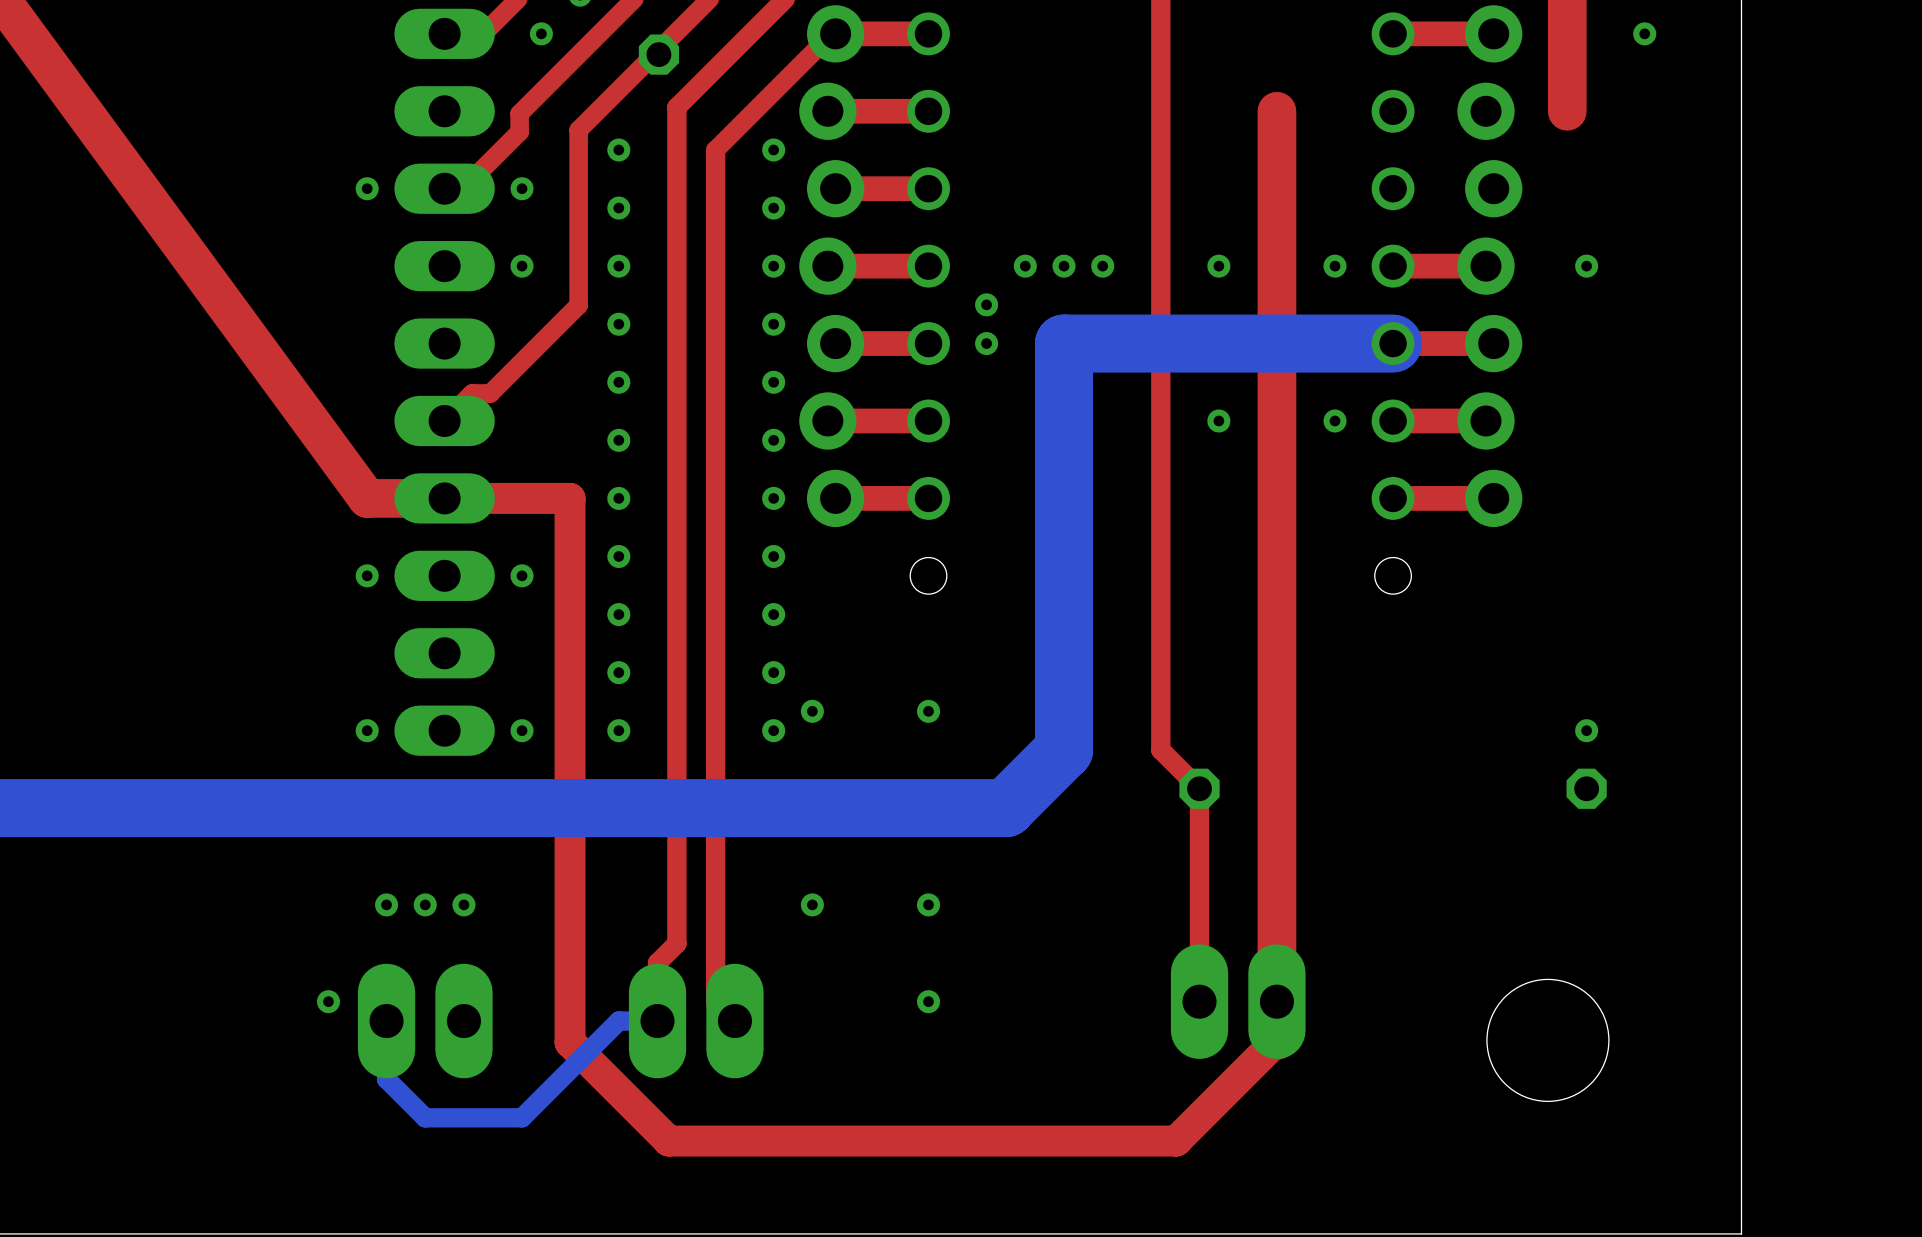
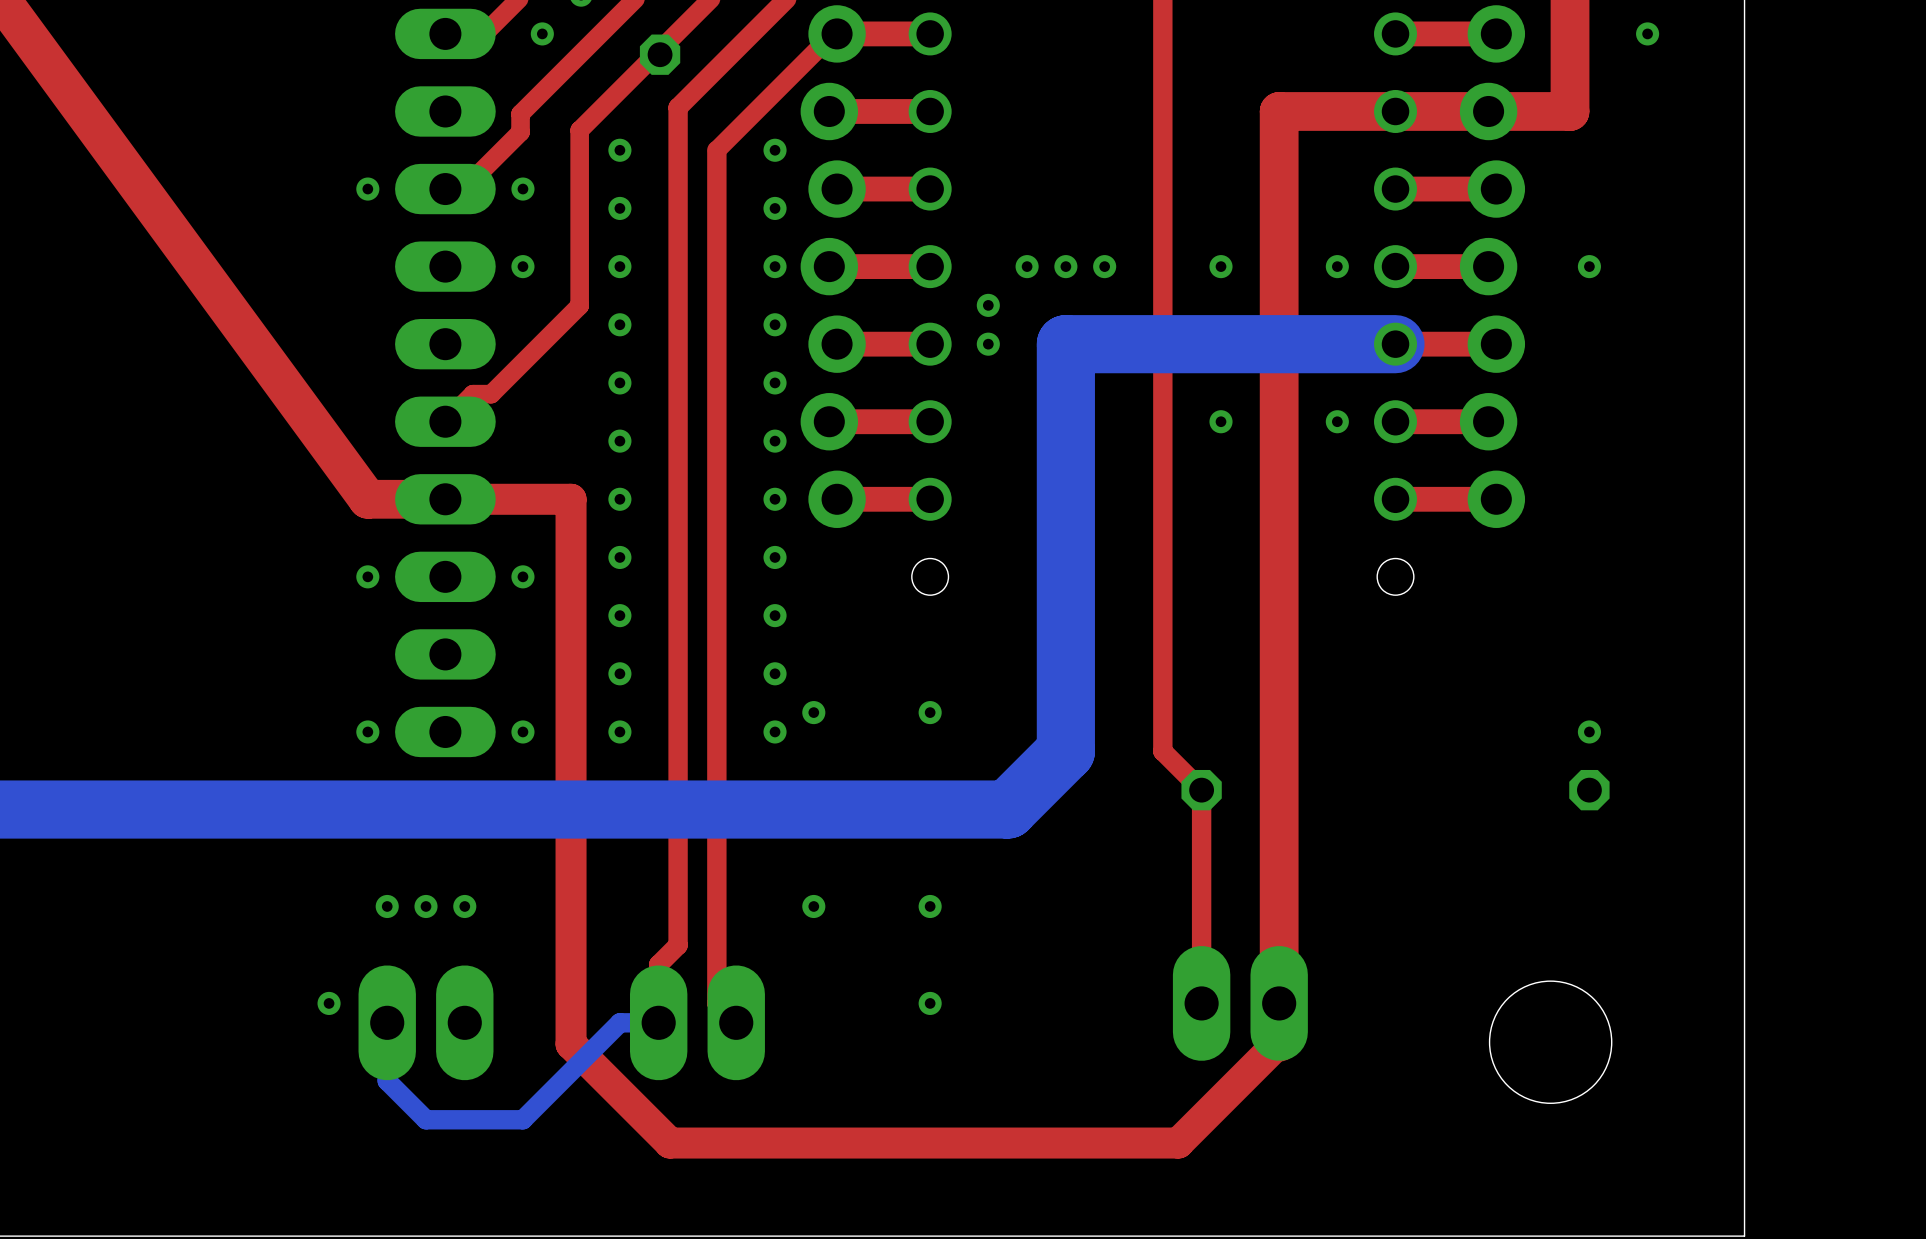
top track: none -> (1570, 111) (1279, 111)
top track: none -> (1496, 189) (1395, 189)

